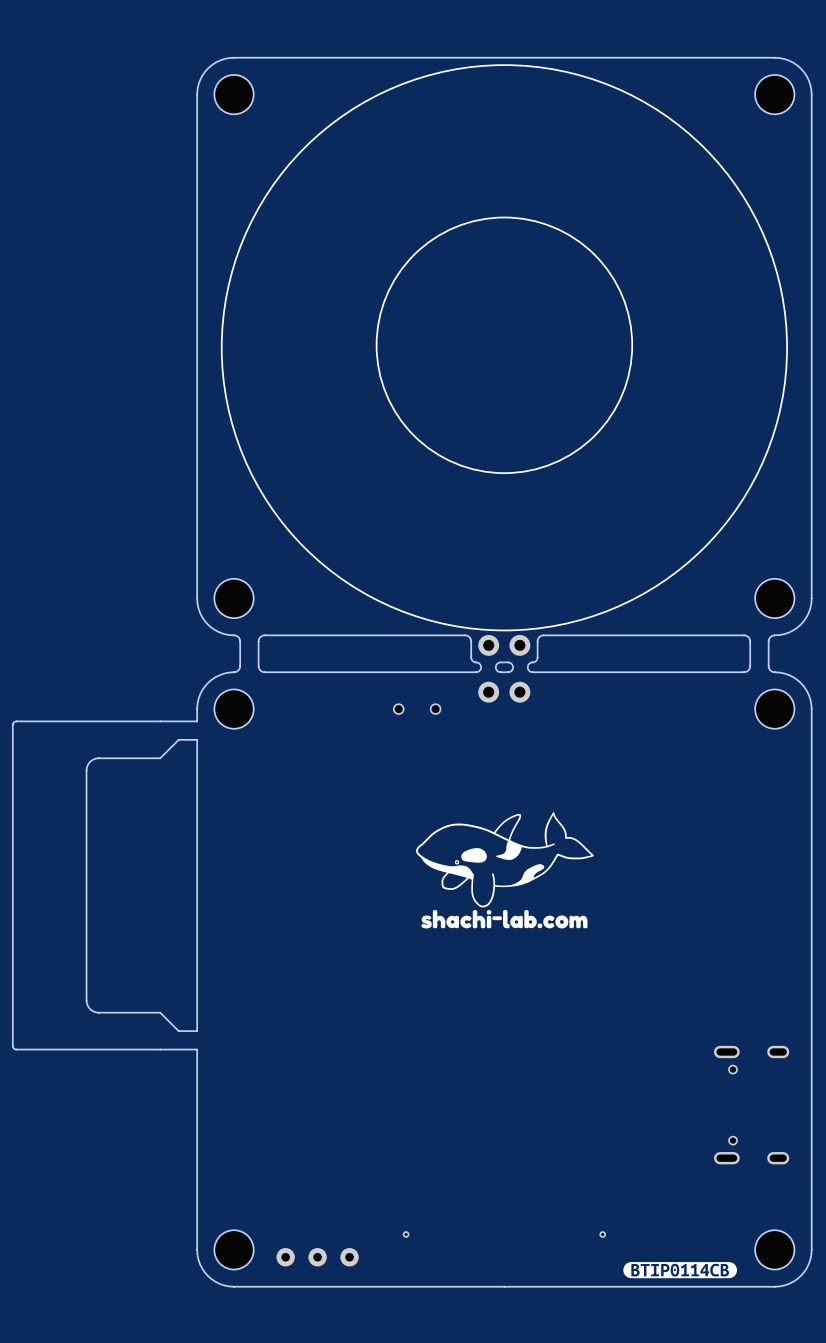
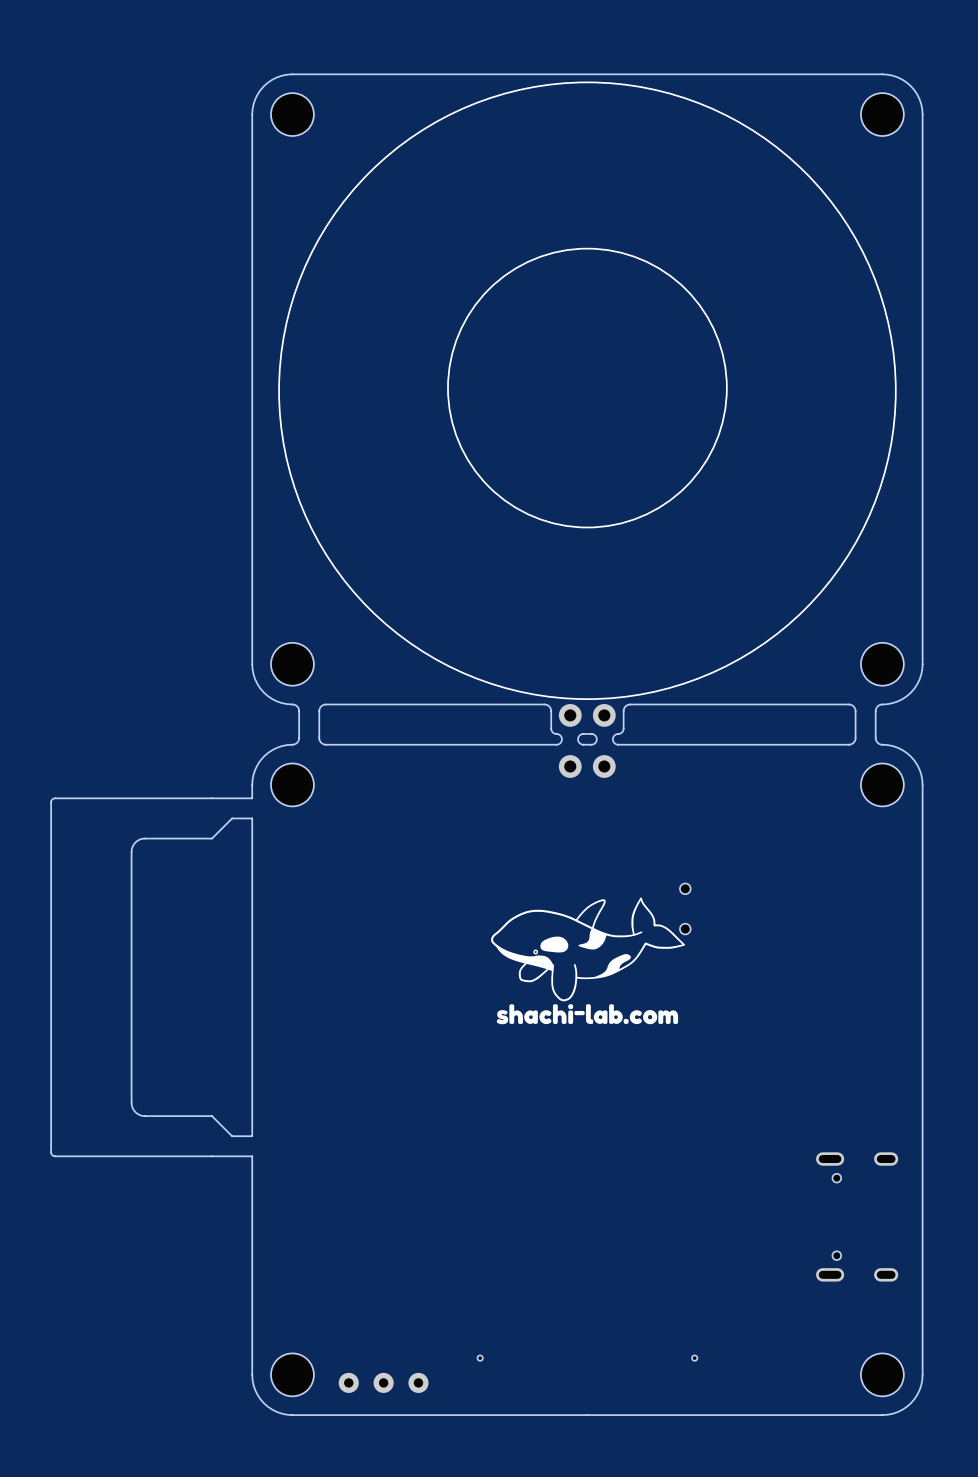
part rotation: 0° (417, 709) -> 90° clockwise (685, 908)
part position: (417, 709) -> (685, 908)
drawing: [623, 1262, 738, 1279] -> none

